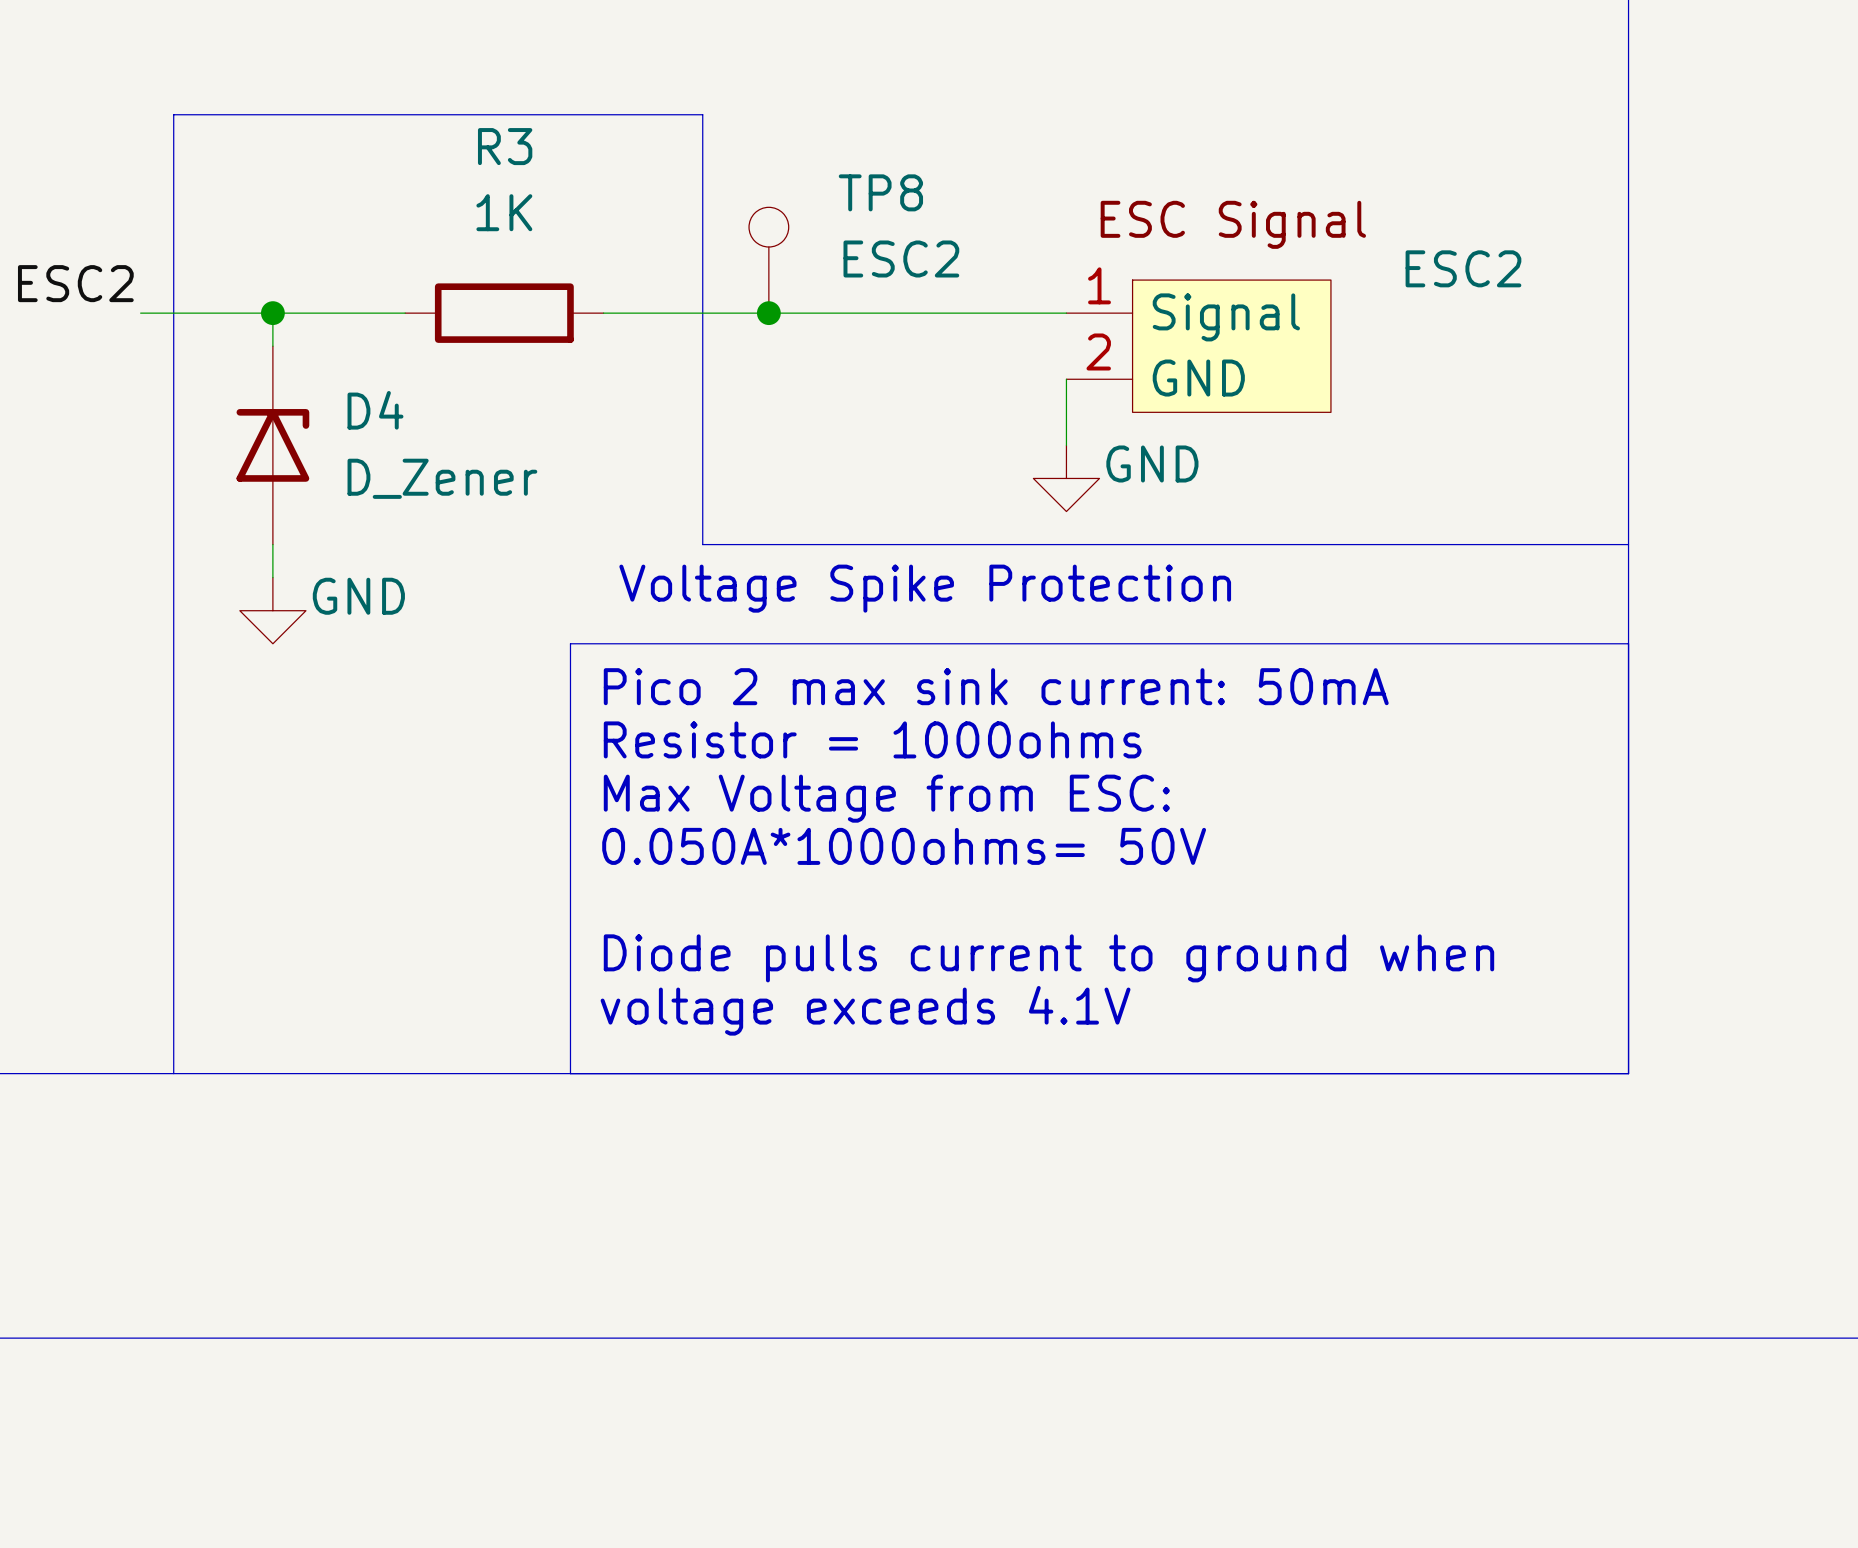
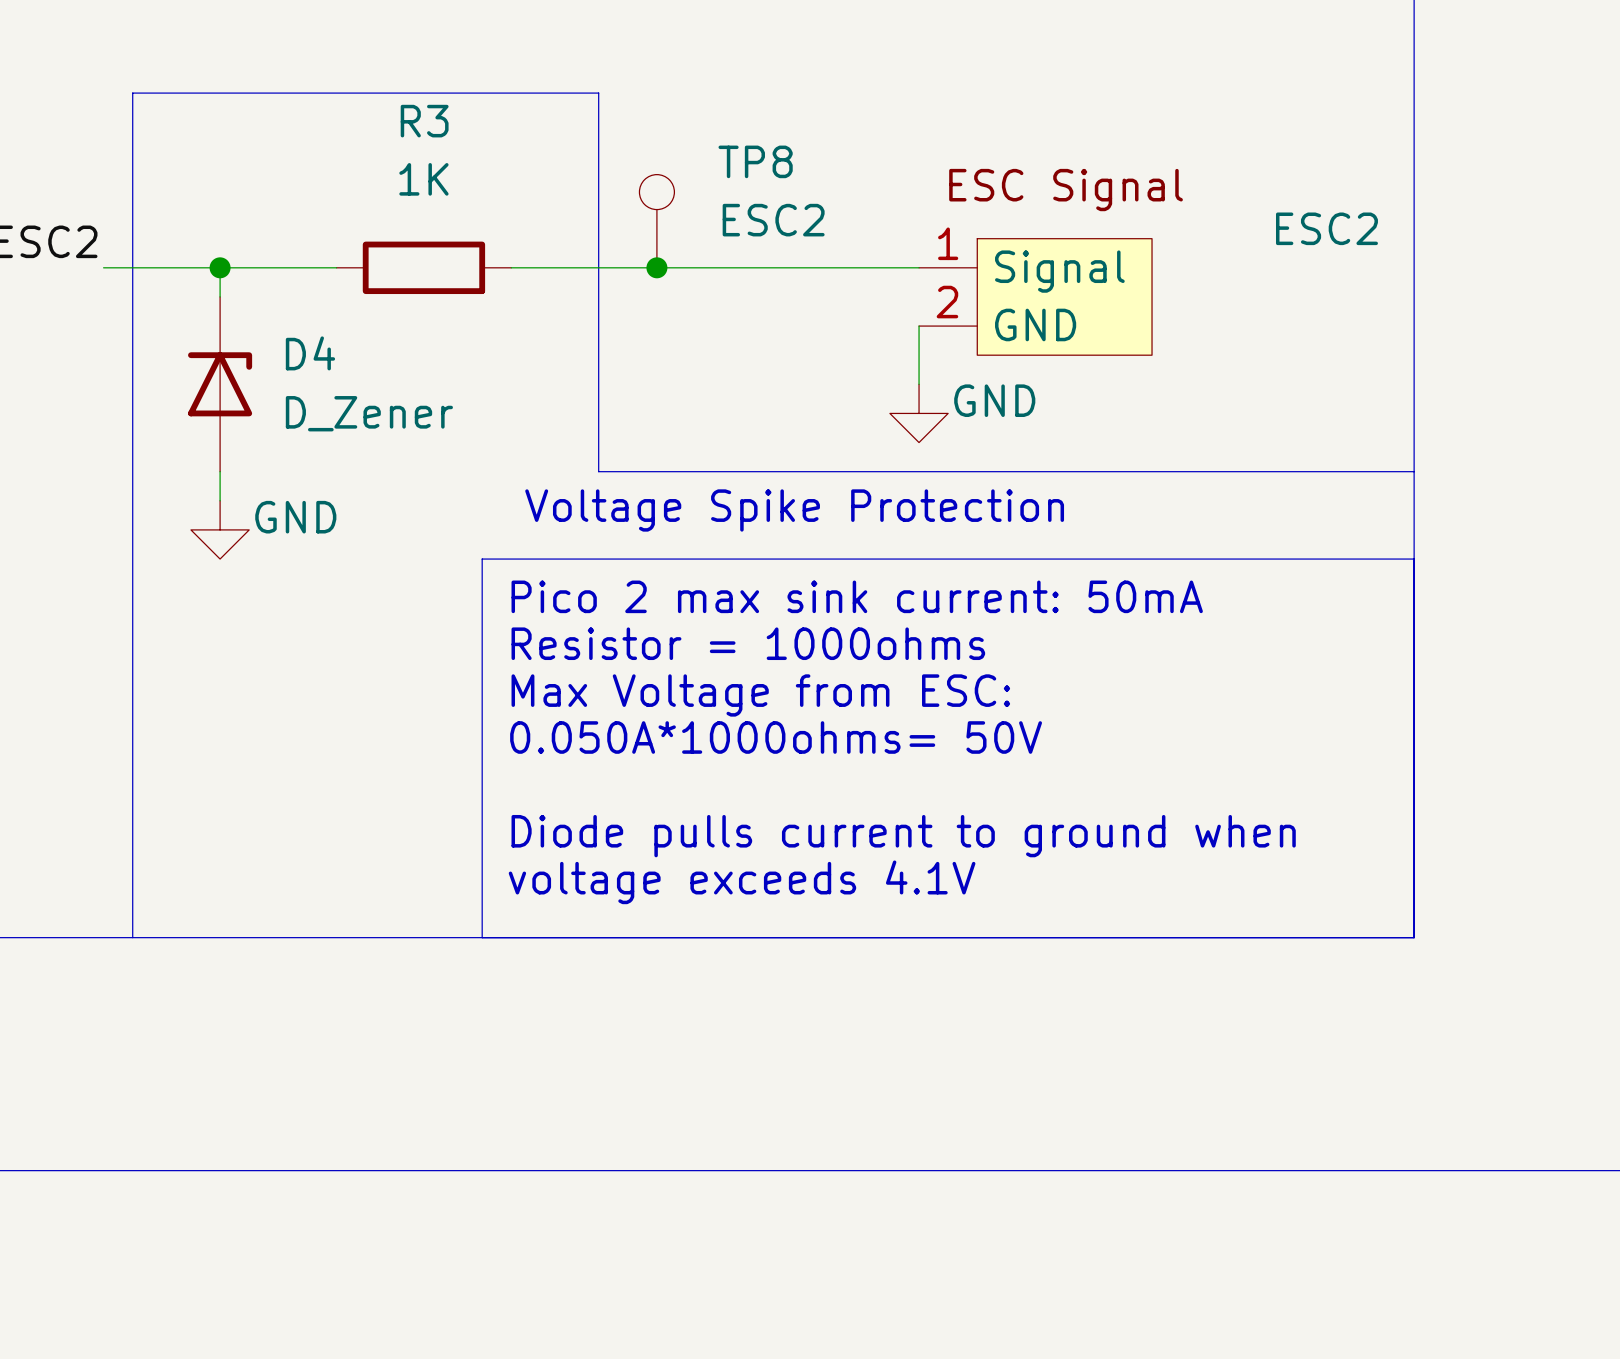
ESC2 name position: ESC2 (1463, 268) -> ESC2 (1326, 228)

